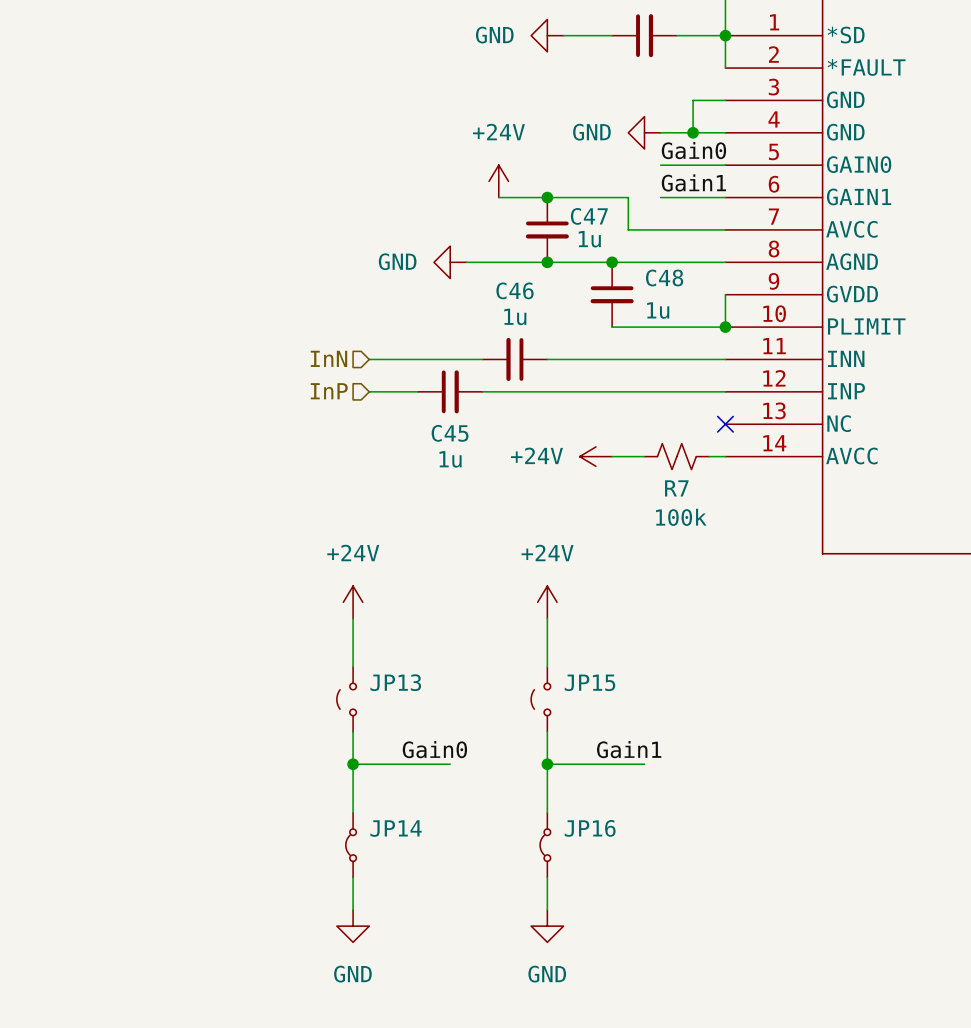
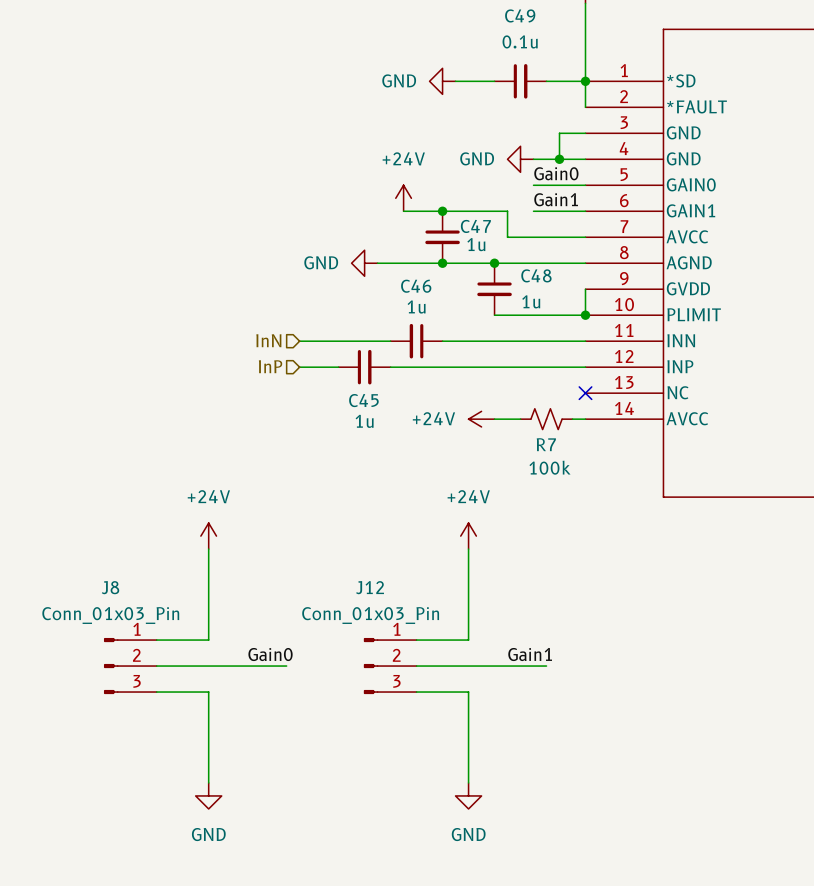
power symbol position: +24V (353, 602) -> +24V (208, 536)
power symbol position: +24V (547, 602) -> +24V (468, 536)
wire: none -> (208, 549) (208, 640) (156, 640)
wire: (353, 618) (353, 667) -> none
wire: (547, 618) (547, 667) -> none
wire: none -> (468, 549) (468, 640) (416, 640)
JP13: (346, 699) -> none
JP15: (540, 699) -> none
wire: (353, 731) (353, 812) -> none
wire: (547, 731) (547, 812) -> none
label position: Gain0 (434, 749) -> Gain0 (270, 654)
label position: Gain1 (629, 749) -> Gain1 (530, 654)
J8: none -> Conn_01x03_Pin (130, 666)
wire: (353, 764) (450, 764) -> (286, 666) (156, 666)
junction: (353, 764) -> none
J12: none -> Conn_01x03_Pin (390, 666)
wire: none -> (416, 666) (442, 666)
junction: (547, 764) -> none
wire: none -> (520, 666) (546, 666)
wire: none -> (156, 692) (208, 692) (208, 782)
wire: none -> (416, 692) (468, 692) (468, 782)
JP14: (351, 845) -> none
JP16: (545, 845) -> none
wire: (353, 877) (353, 909) -> none
wire: (547, 877) (547, 909) -> none
power symbol position: GND (353, 926) -> GND (208, 795)
power symbol position: GND (547, 926) -> GND (468, 795)

